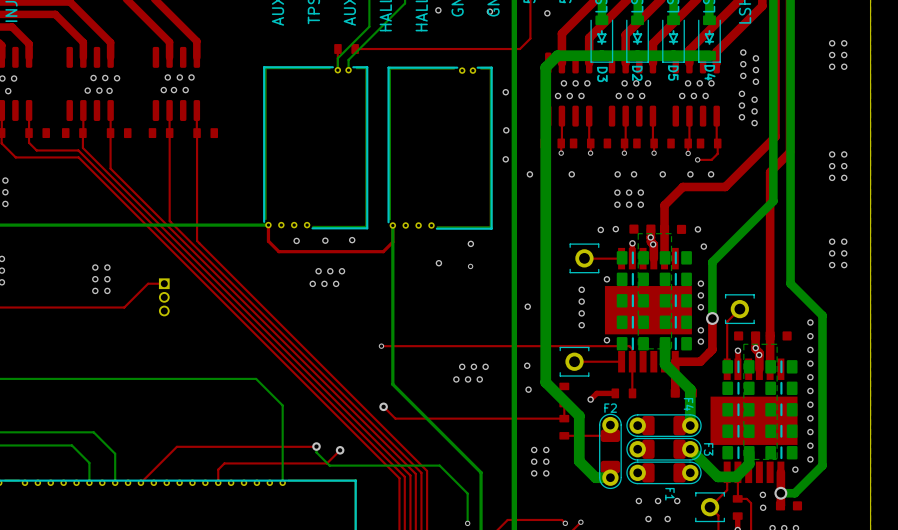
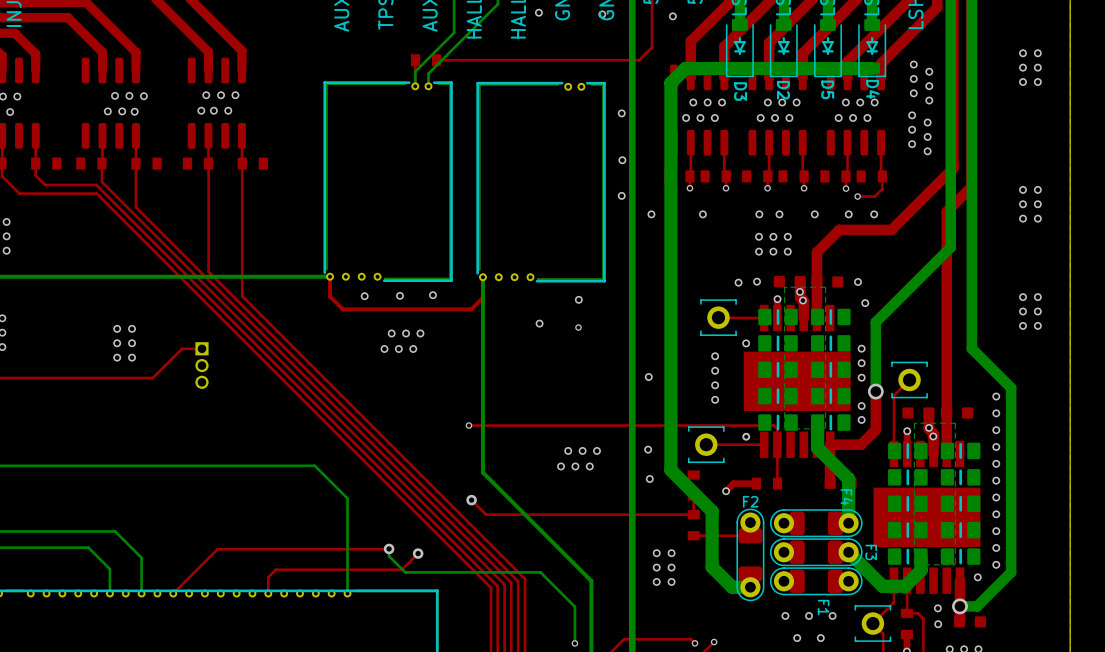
via: (606, 340) -> none
via: none -> (746, 436)

